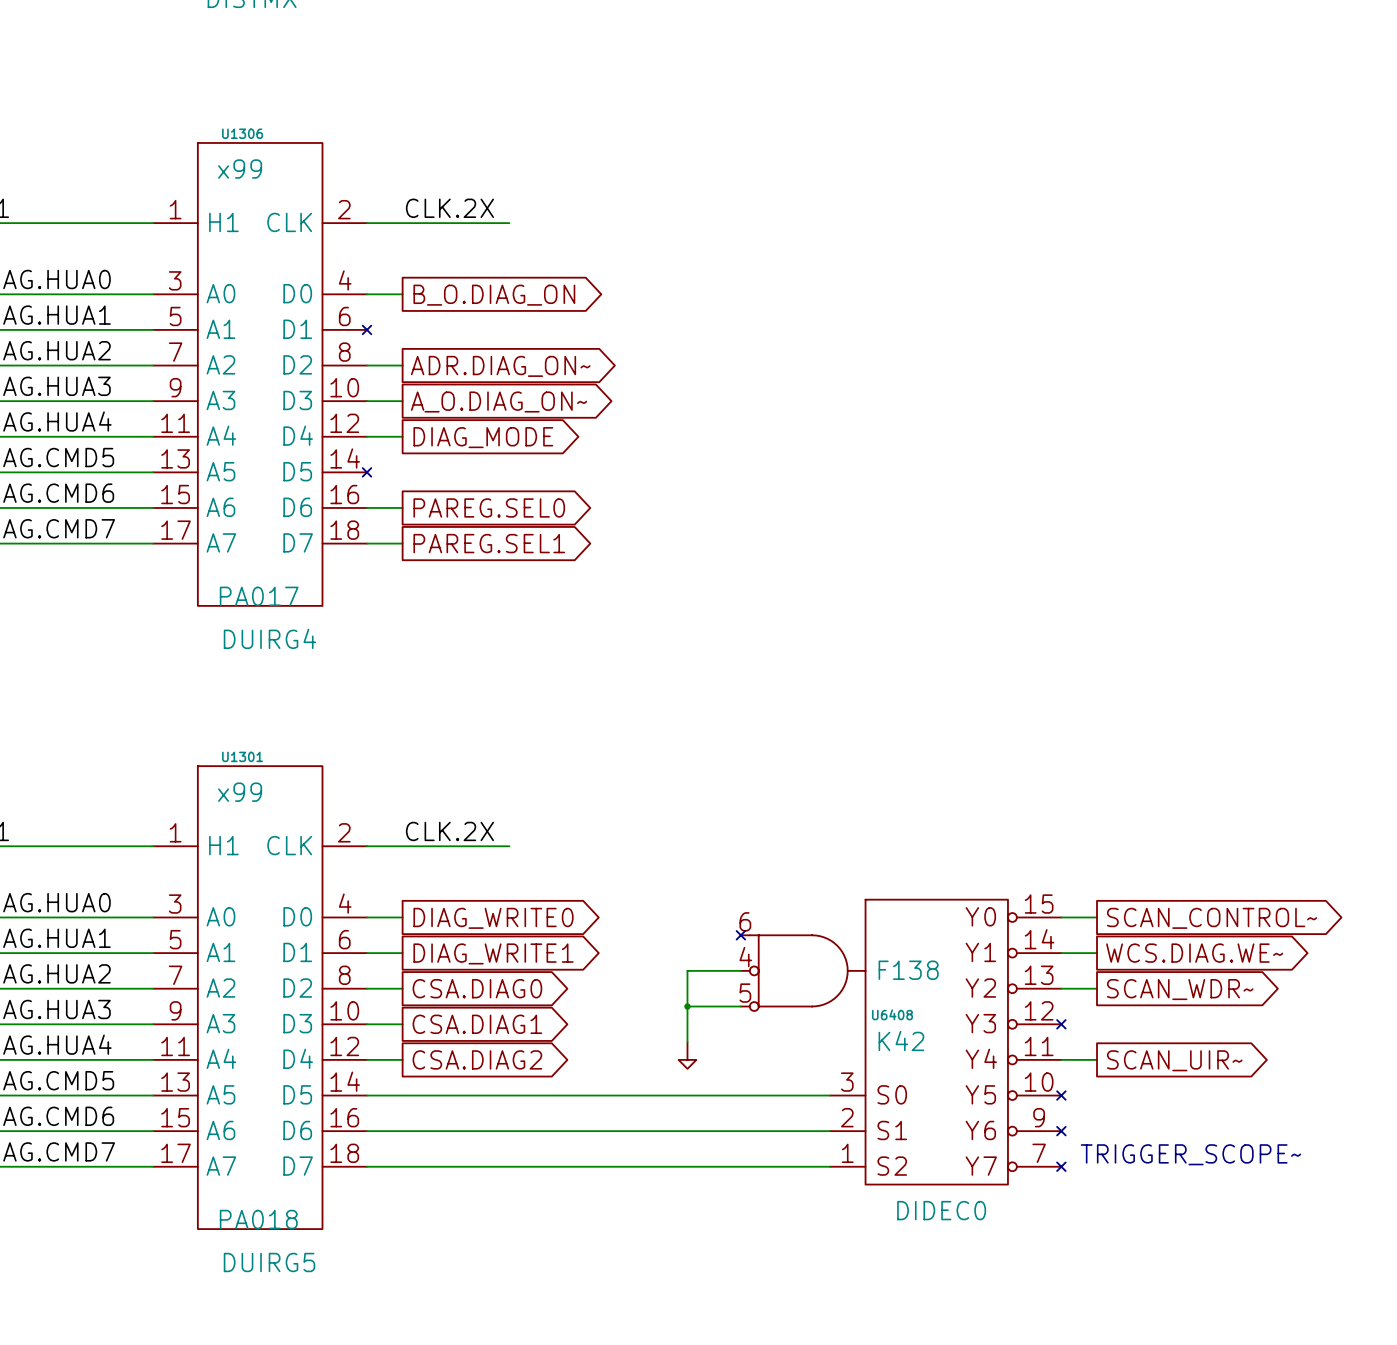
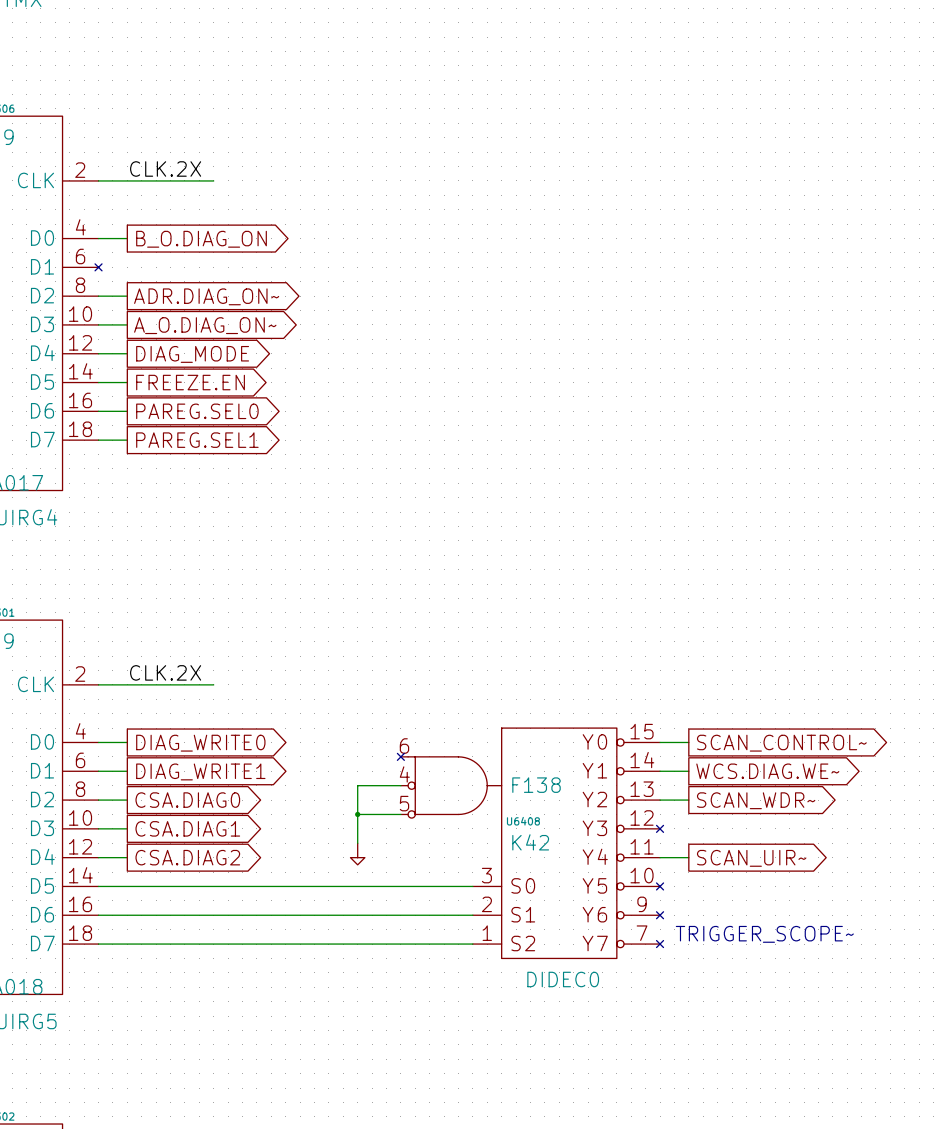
wire: none -> (98, 382) (127, 382)
no-connect mark: (367, 472) -> none
global label: none -> FREEZE.EN (190, 382)

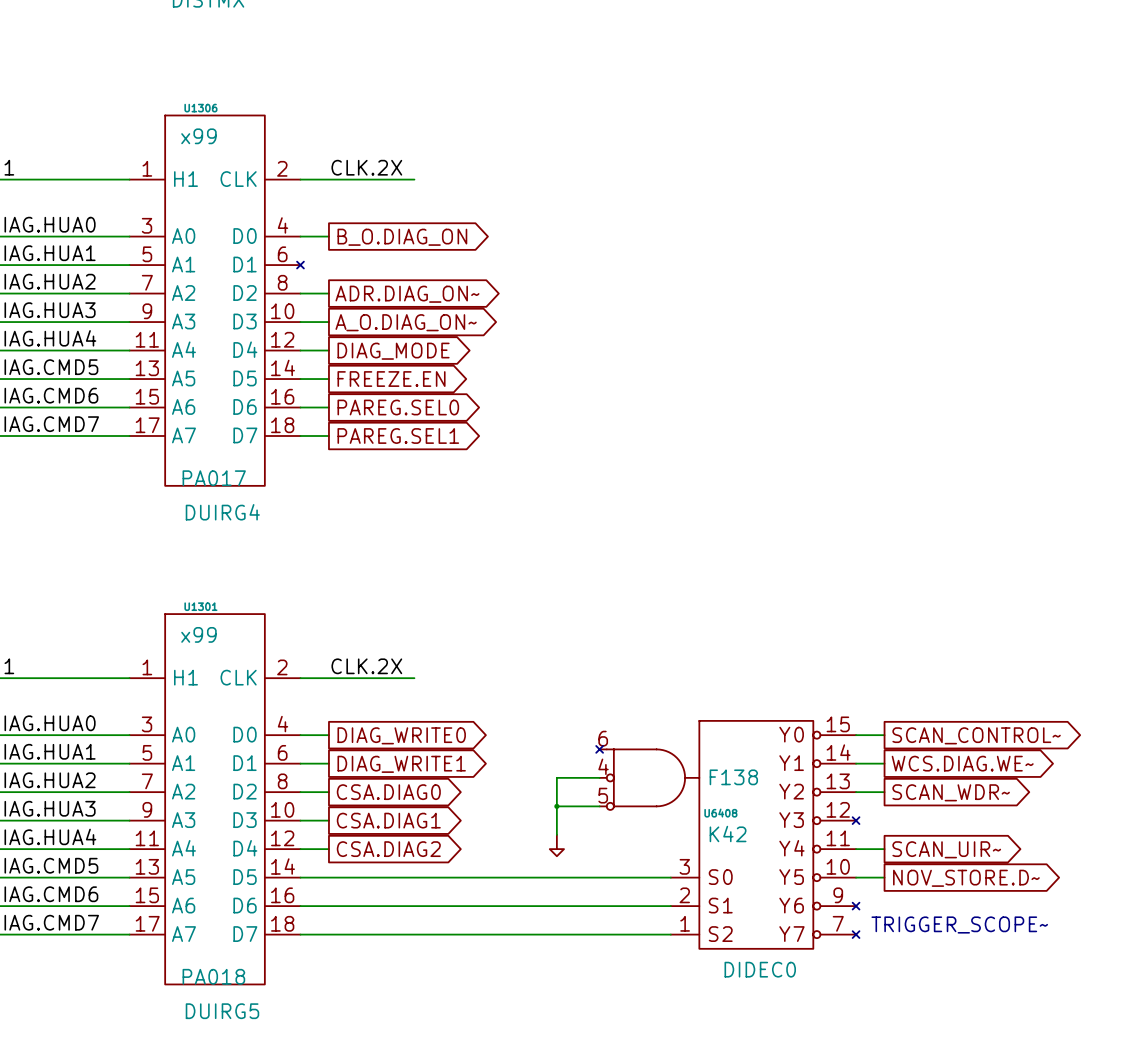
wire: none -> (856, 877) (884, 877)
no-connect mark: (660, 886) -> none
global label: none -> NOV_STORE.D~ (966, 878)

